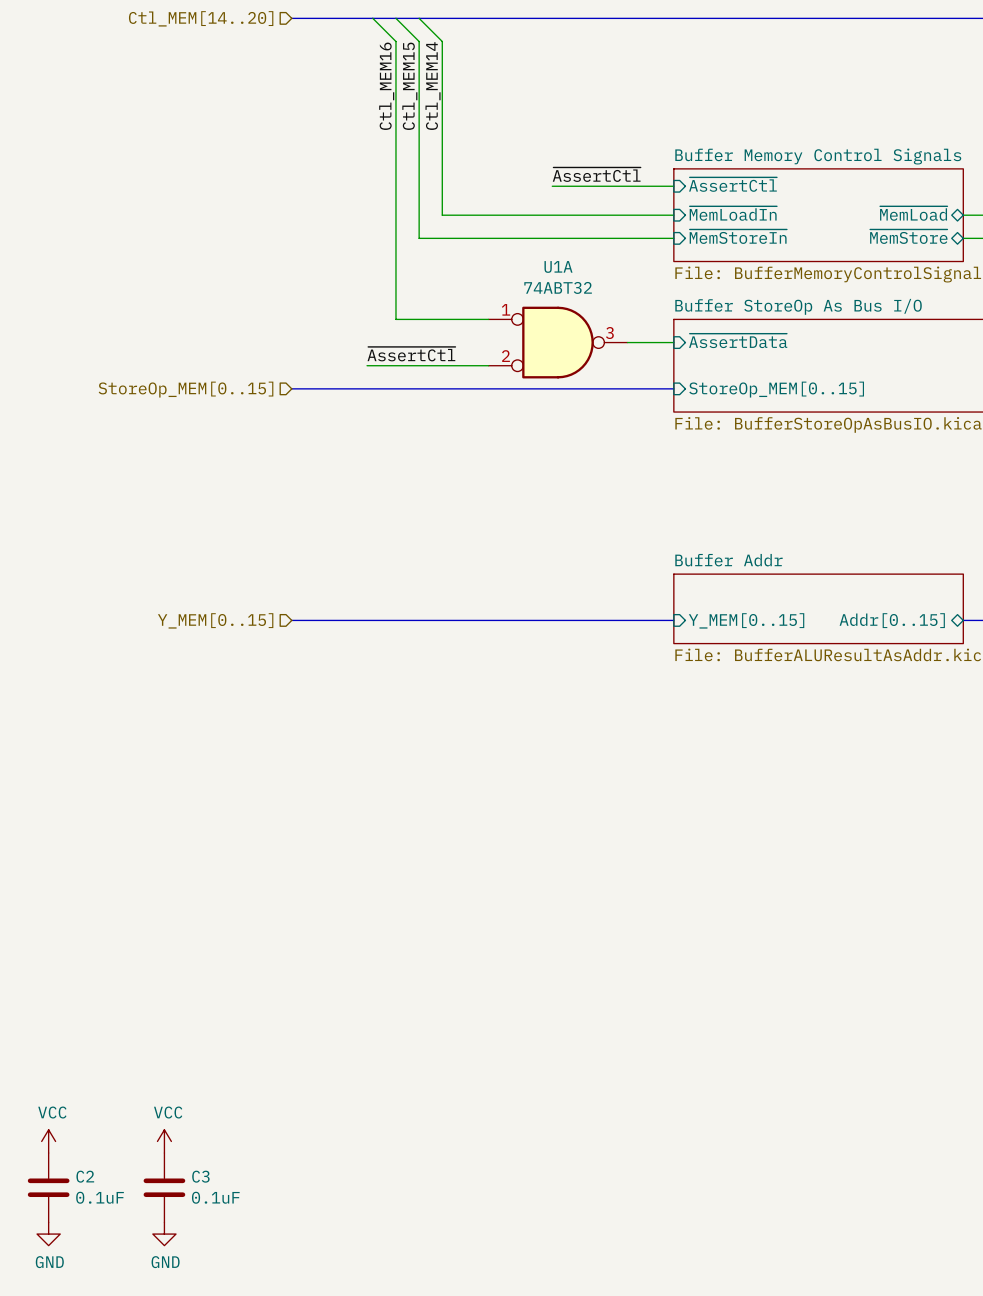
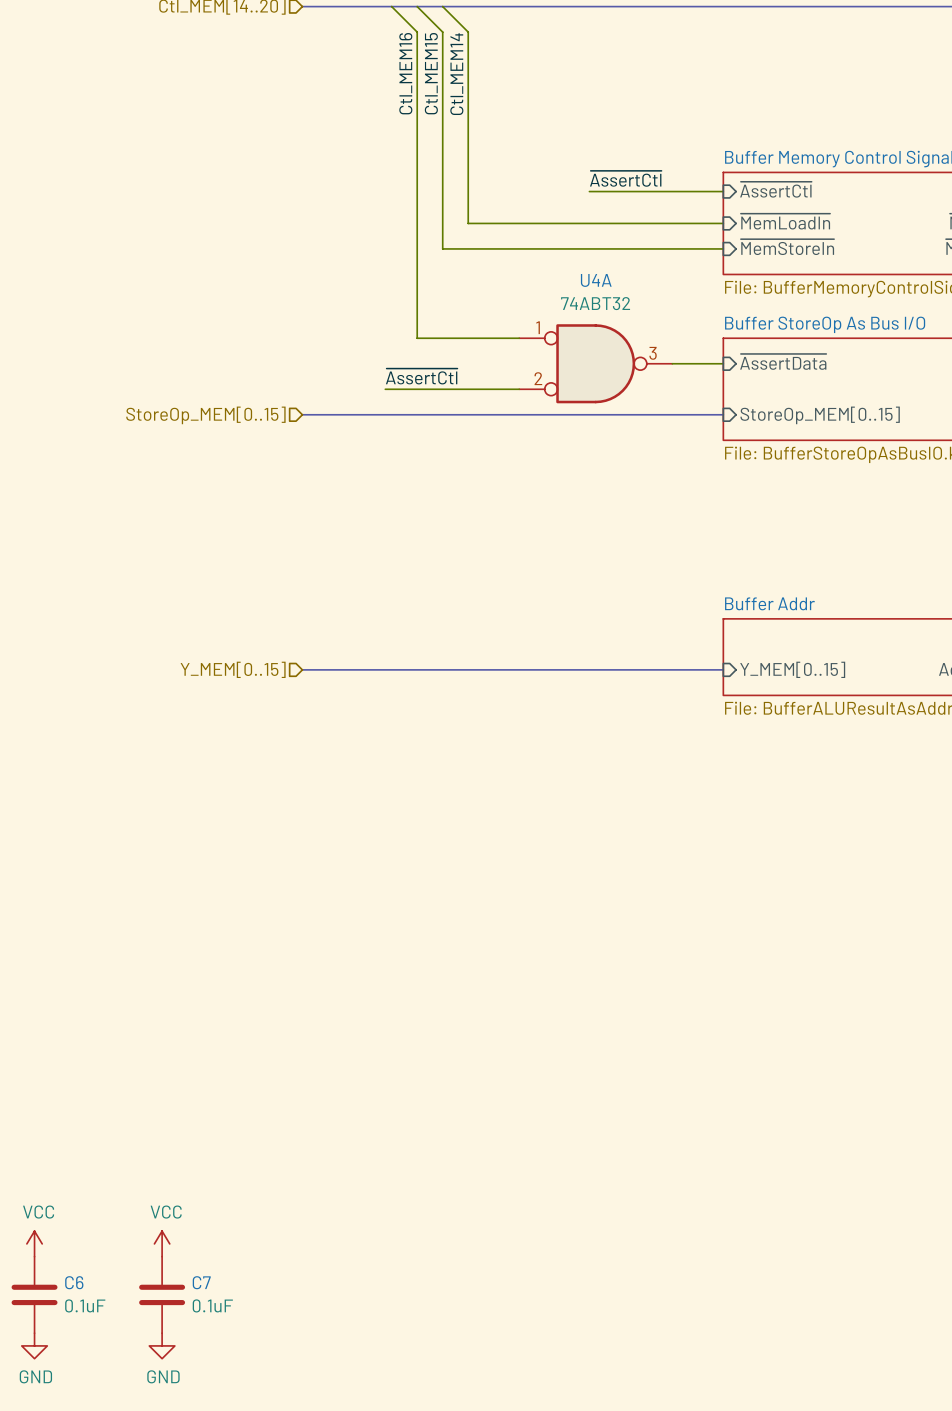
U1A name: U1A (558, 266) -> U4A (596, 280)
C2 name: C2 (85, 1176) -> C6 (74, 1282)
C3 name: C3 (200, 1176) -> C7 (201, 1282)

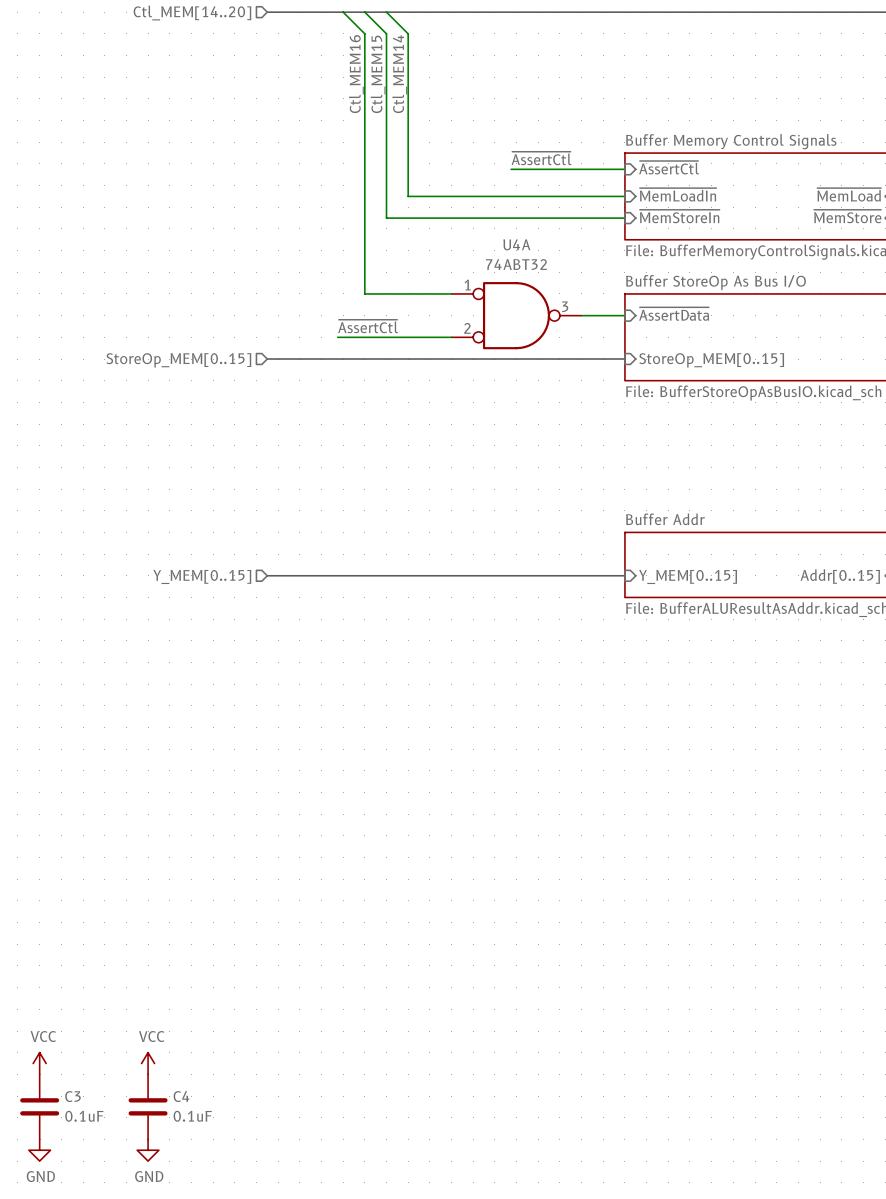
C6 name: C6 (74, 1282) -> C3 (72, 1096)
C7 name: C7 (201, 1282) -> C4 (181, 1096)

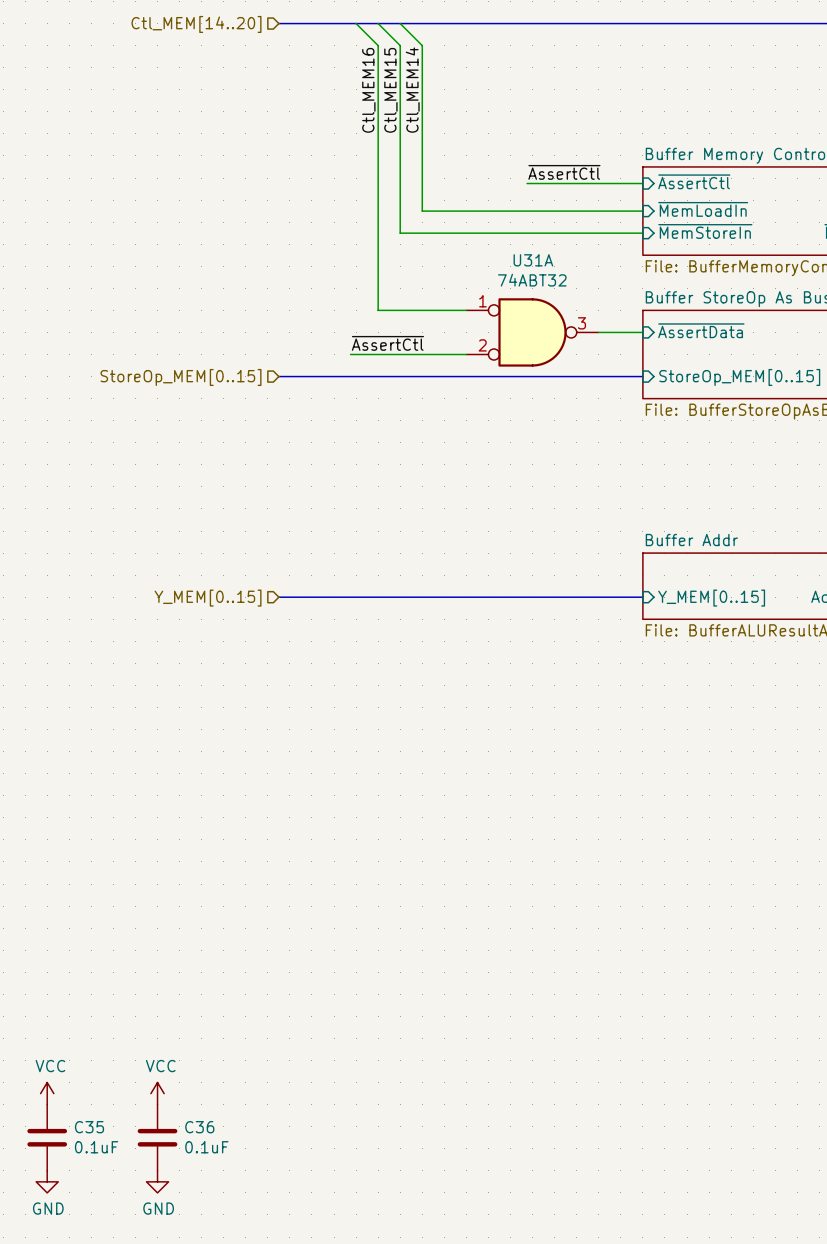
U4A name: U4A (516, 244) -> U31A (533, 260)
C3 name: C3 (72, 1096) -> C35 (89, 1127)
C4 name: C4 (181, 1096) -> C36 (199, 1127)

